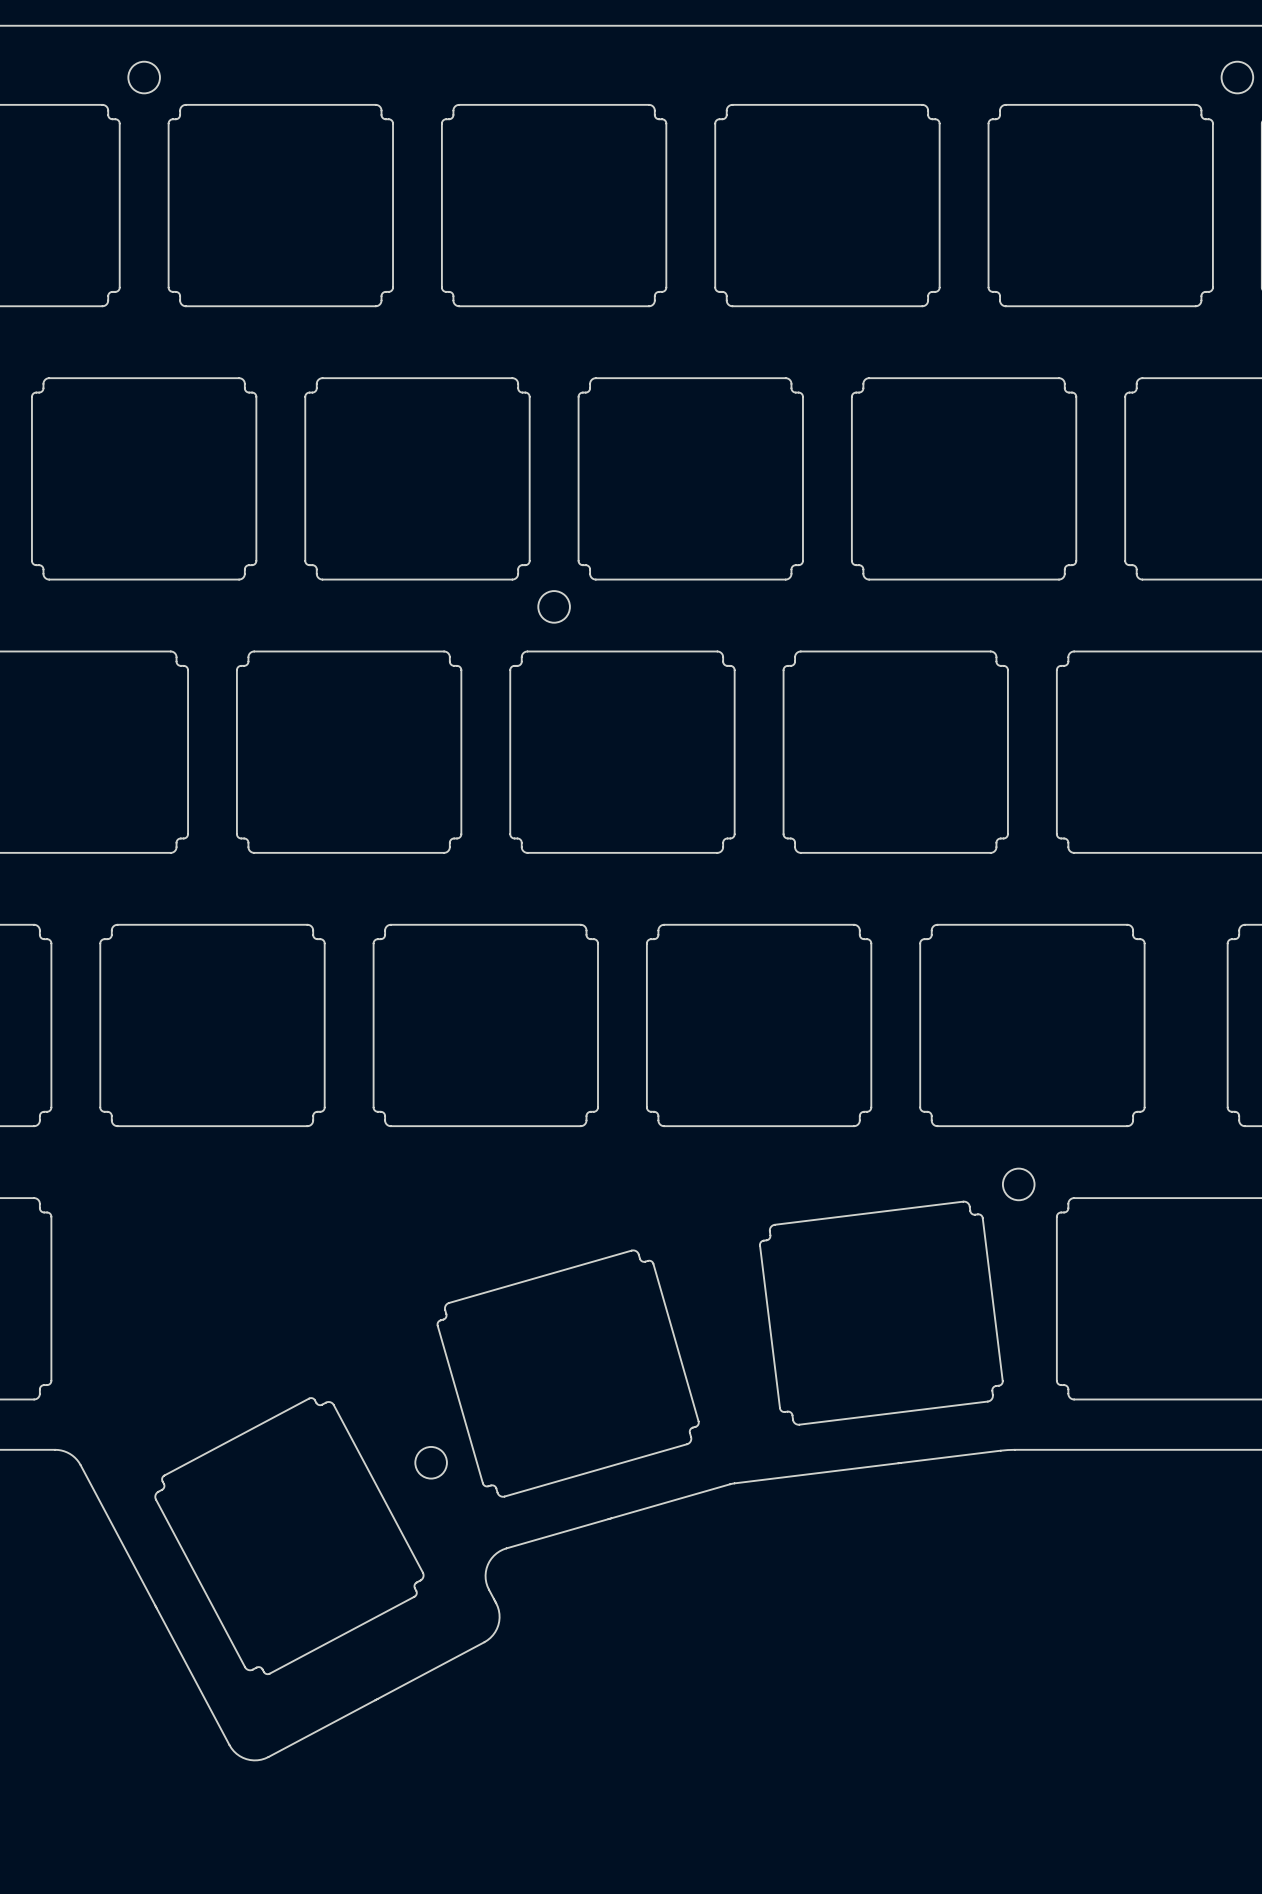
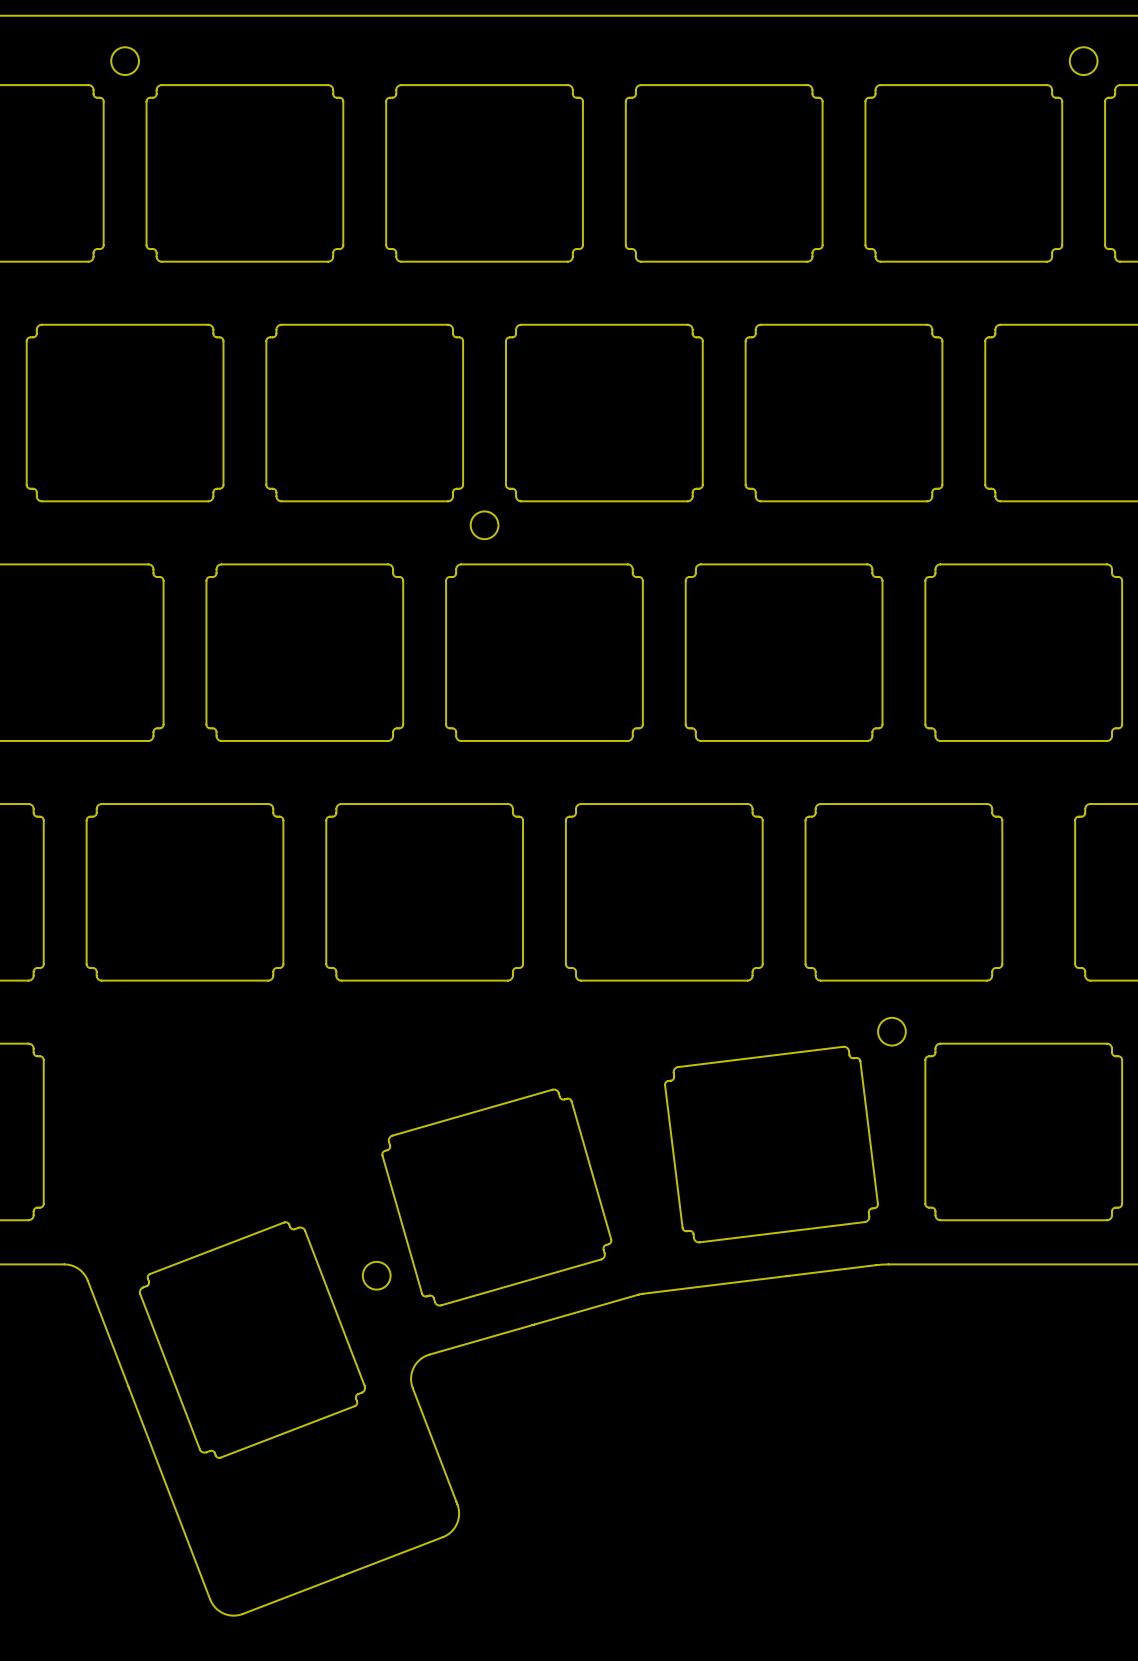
drawing shape: [154, 1397, 425, 1676] -> [139, 1221, 366, 1459]
board edge: (55, 1449) (70, 1453) (79, 1462) (229, 1745) (239, 1756) (250, 1760) (268, 1757) (490, 1637) (498, 1625) (499, 1614) (487, 1586) (485, 1571) (493, 1555) (506, 1548) -> (47, 1264) (73, 1266) (80, 1270) (86, 1277) (210, 1599) (217, 1610) (229, 1615) (242, 1613) (442, 1537) (453, 1529) (458, 1517) (458, 1507) (411, 1379) (413, 1367) (419, 1360) (426, 1355) (442, 1350)

